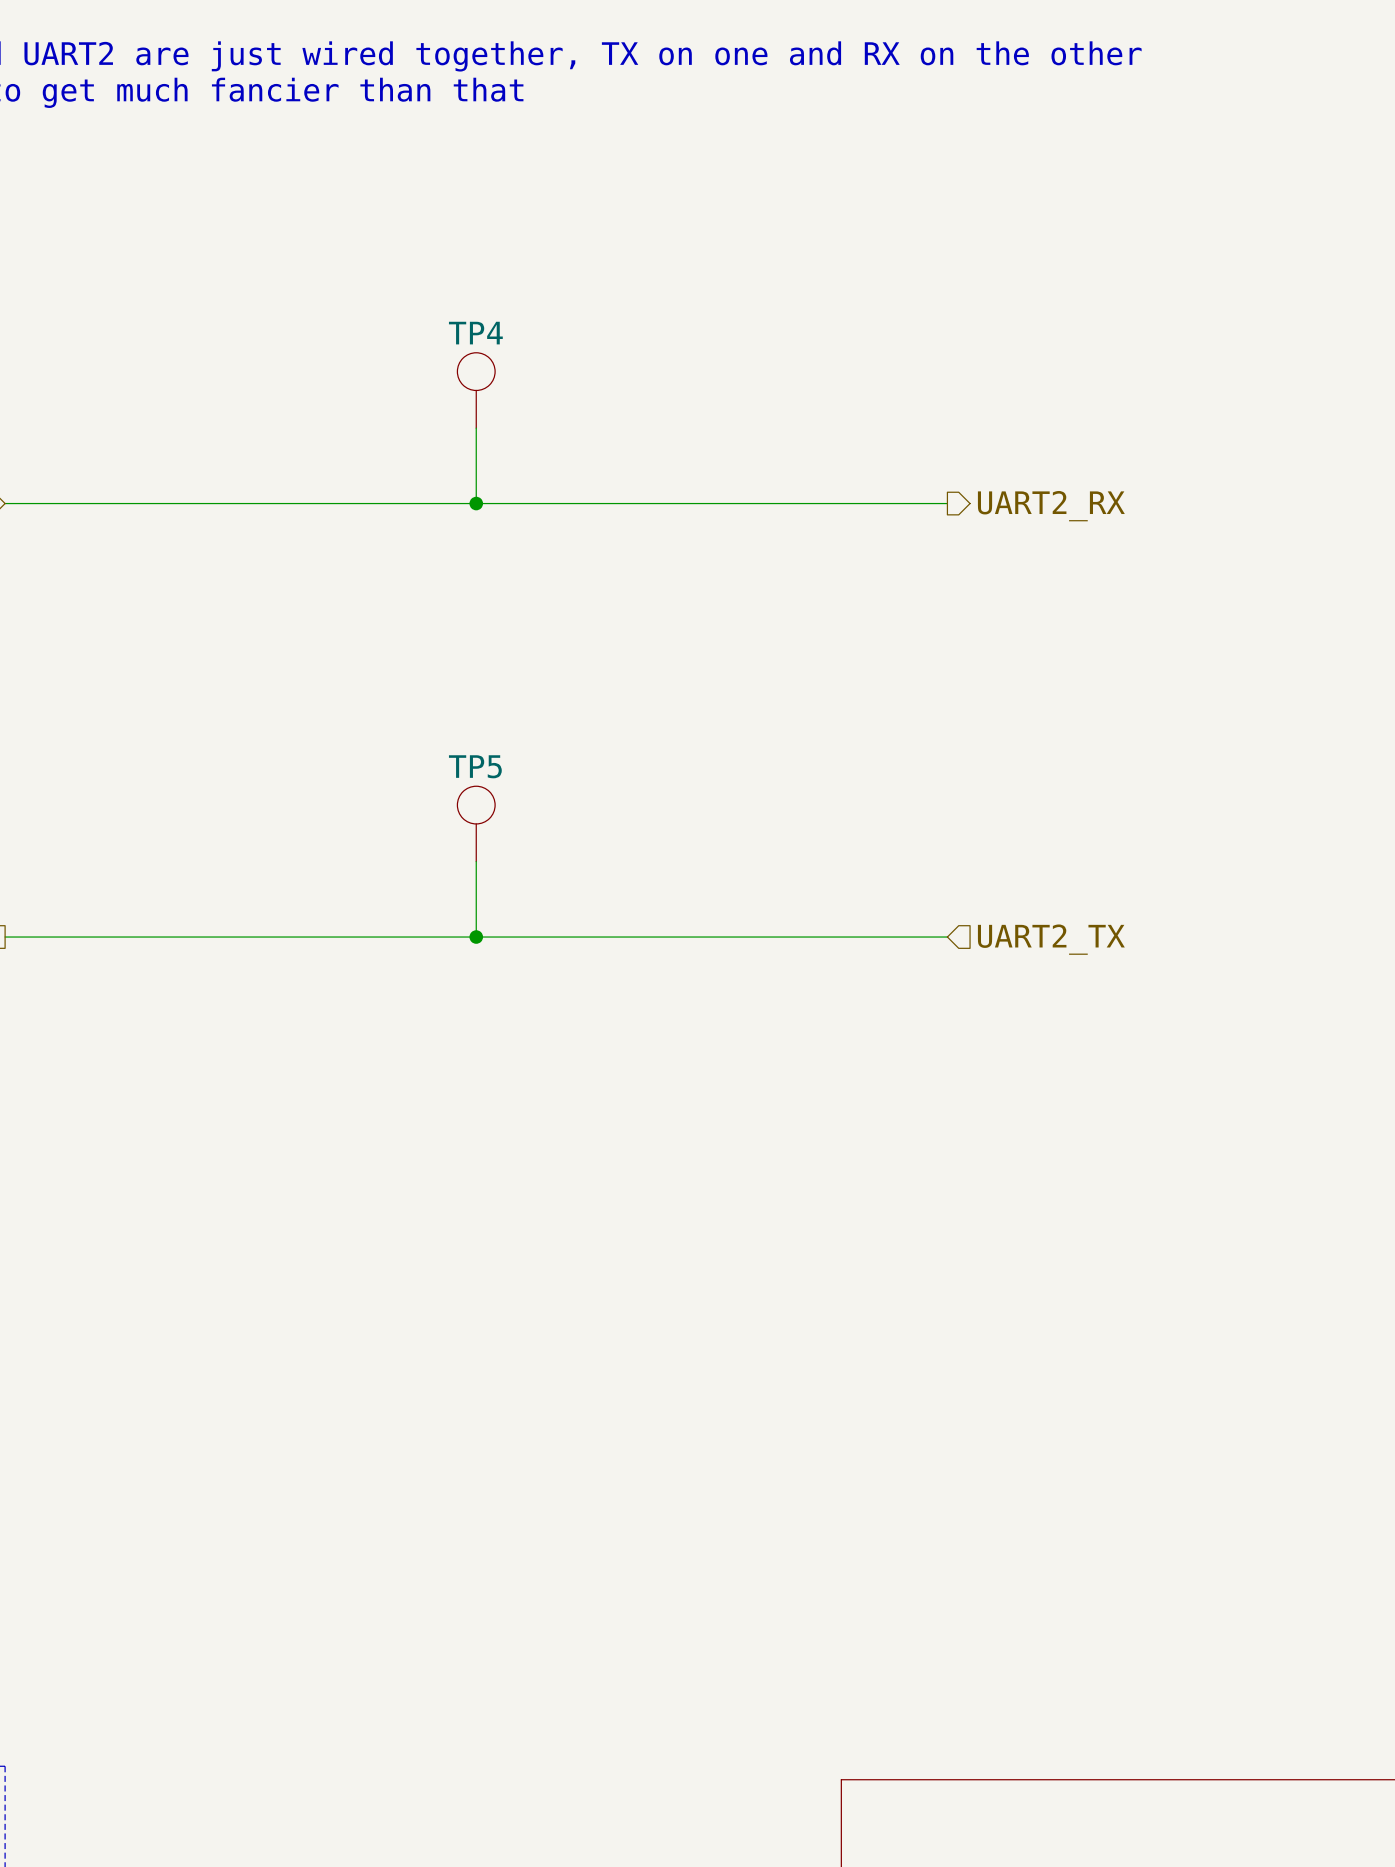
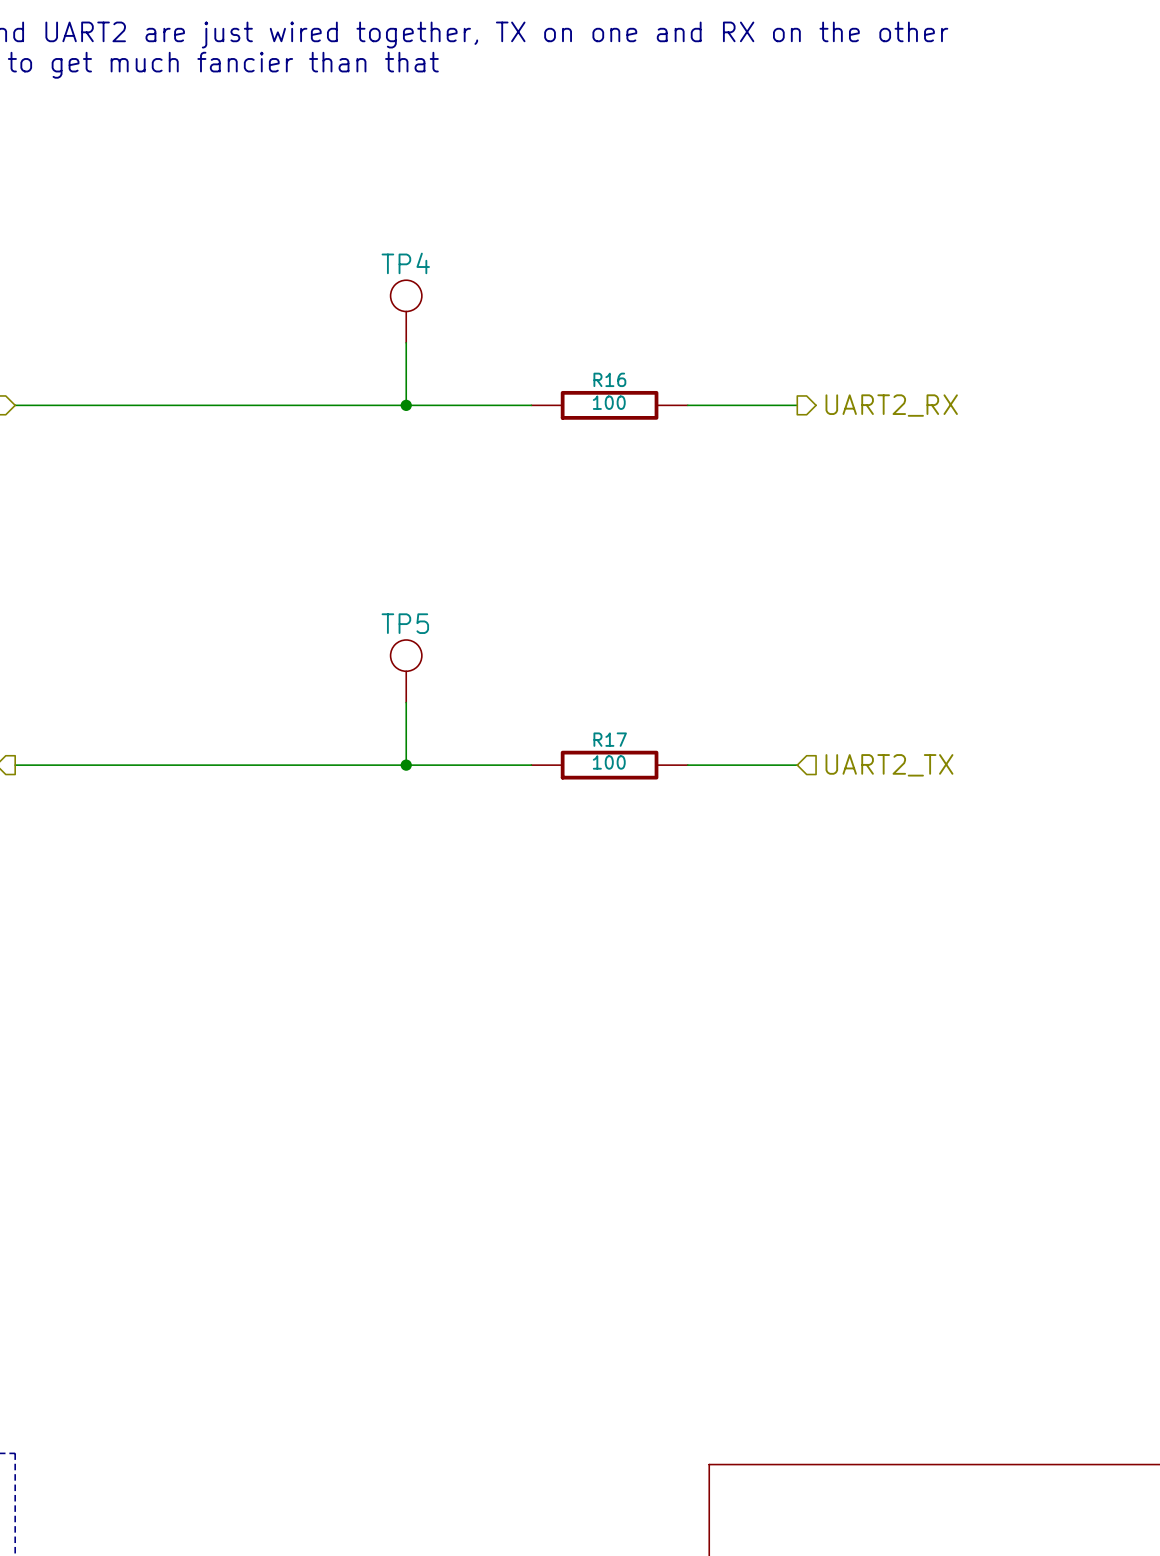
wire: (627, 503) (815, 503) -> none
R16: none -> 100 (609, 405)
wire: (627, 937) (815, 937) -> none
R17: none -> 100 (609, 765)

